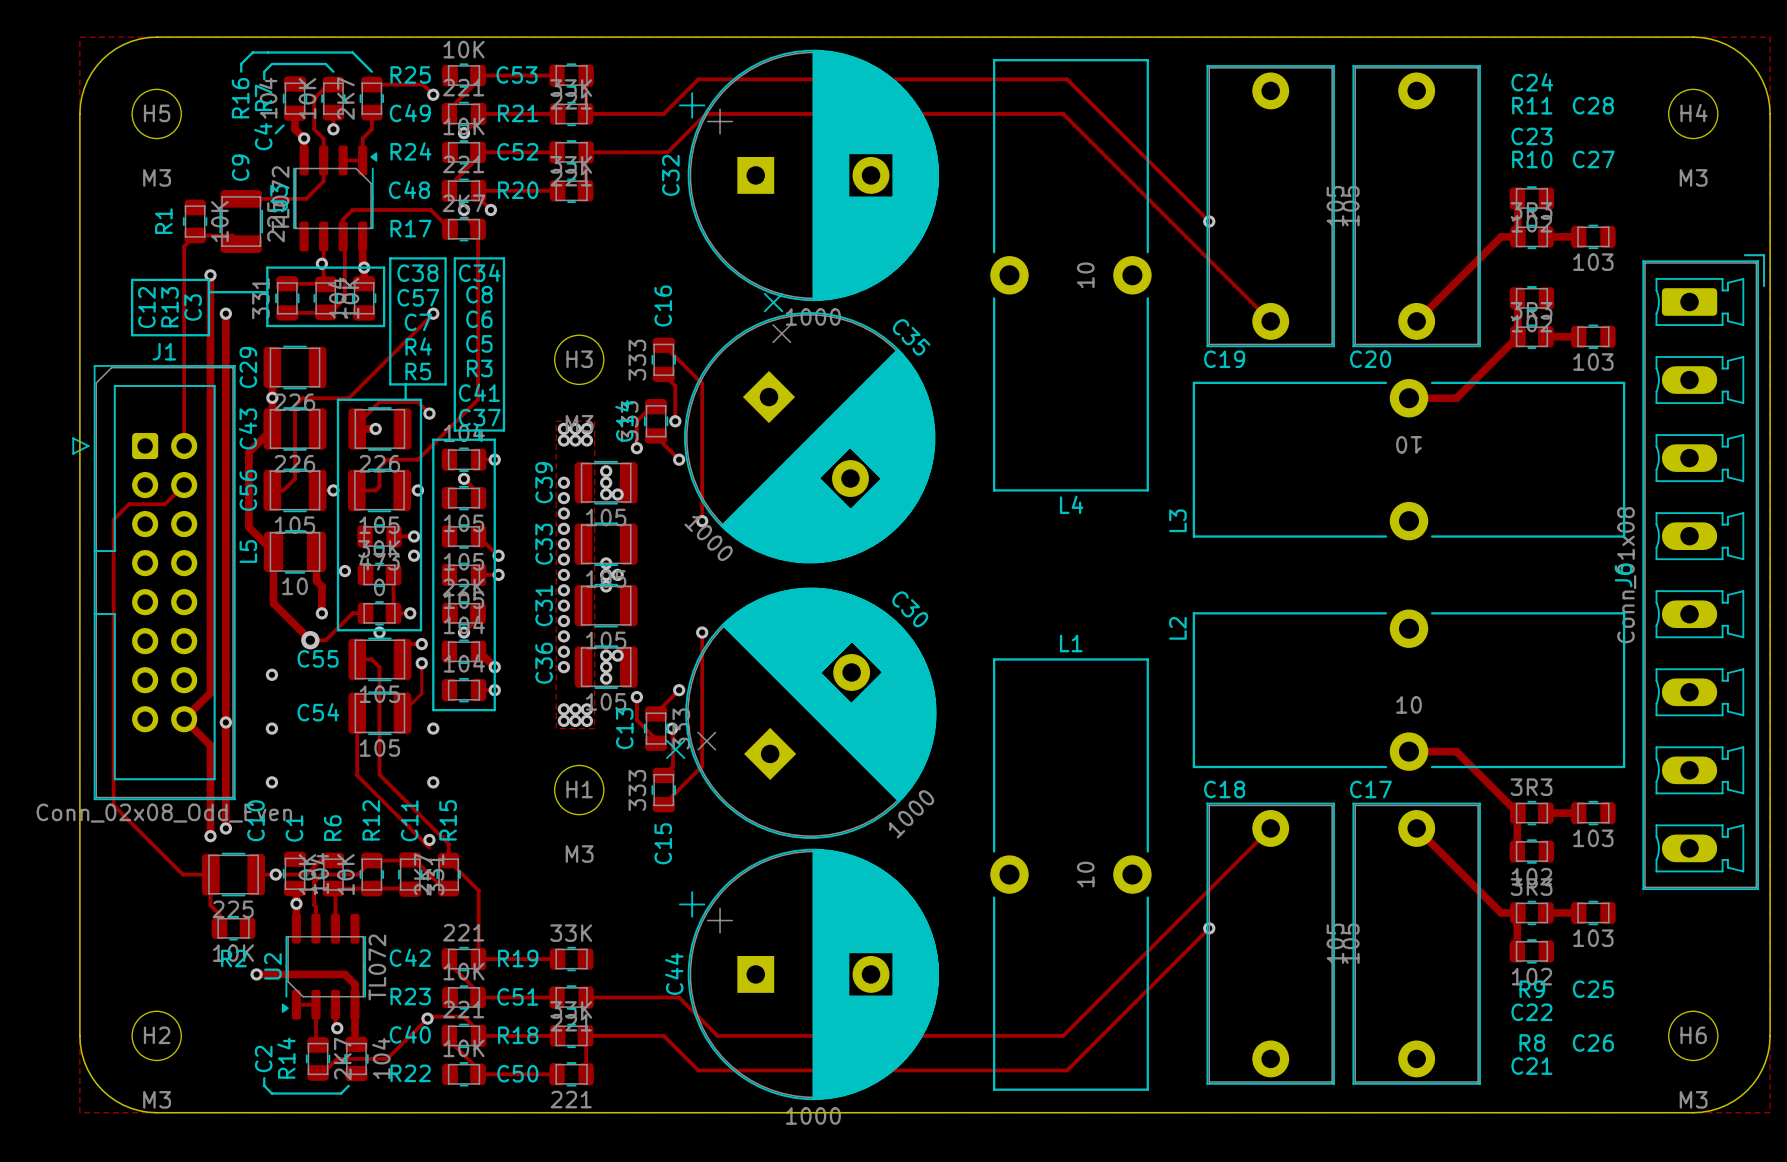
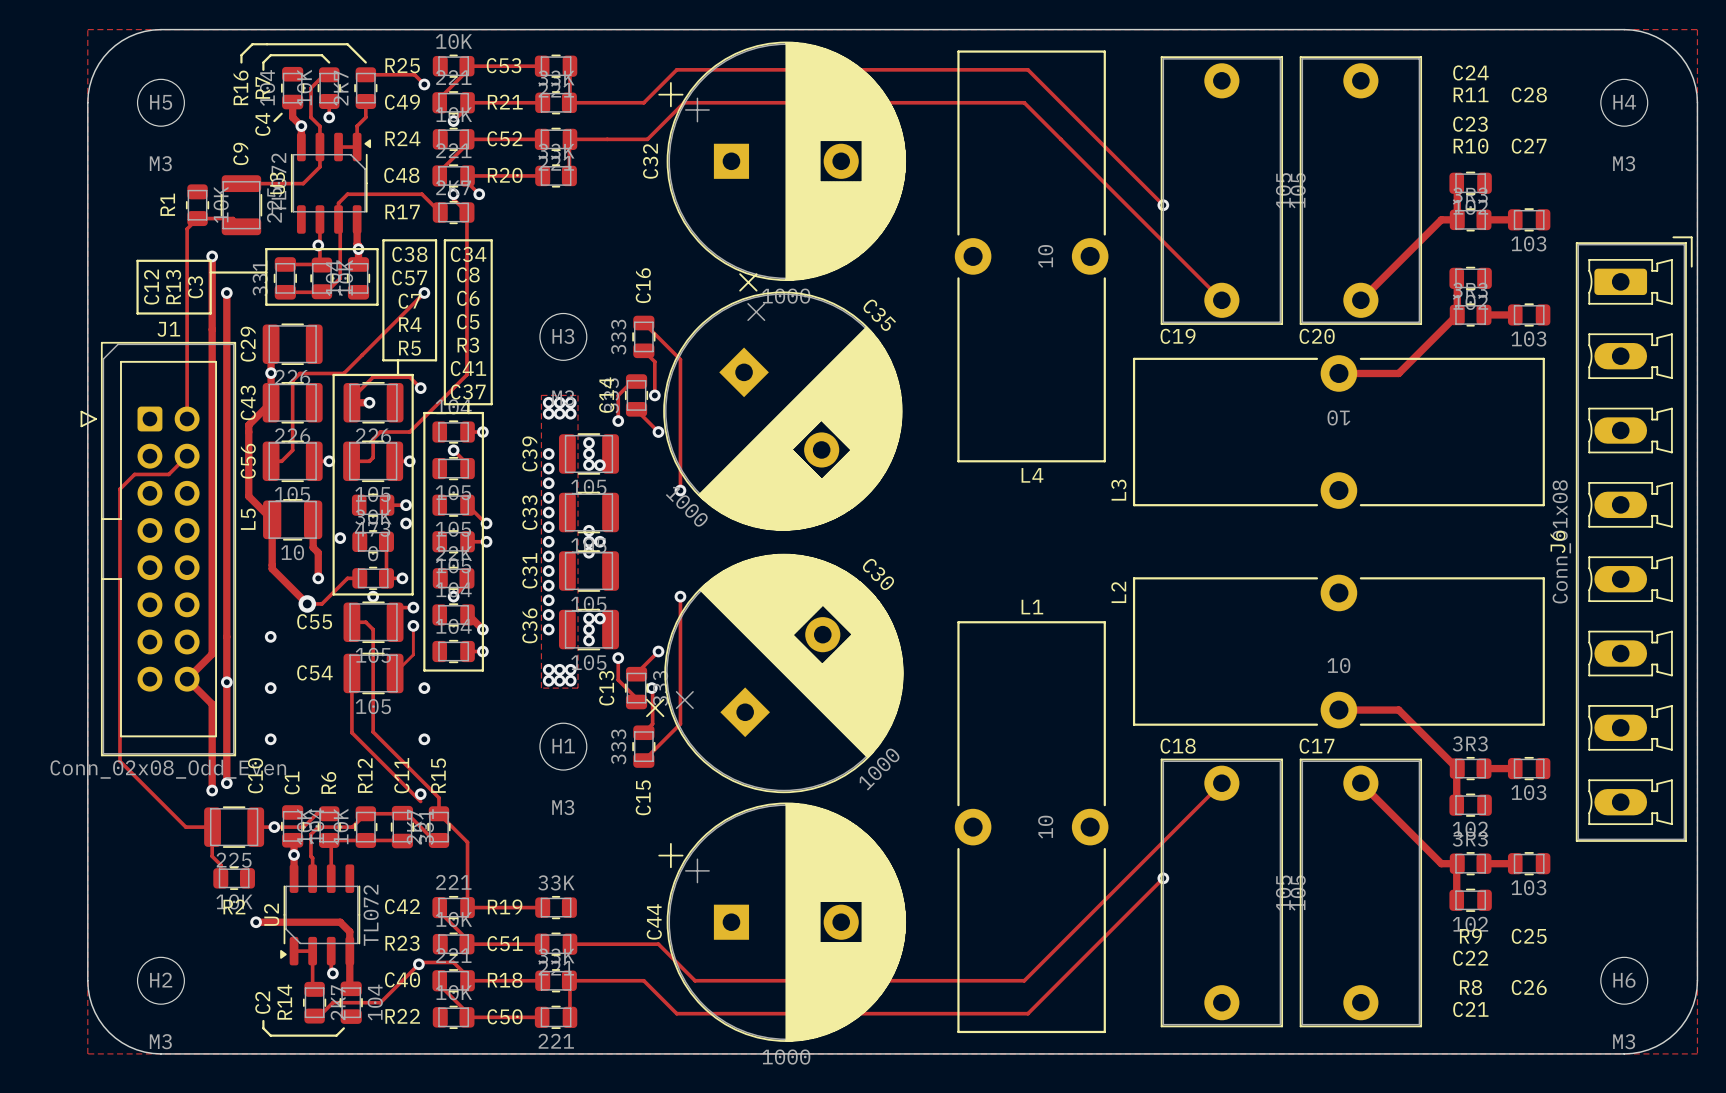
L3 position: (1409, 459) -> (1338, 432)
L2 position: (1409, 690) -> (1338, 651)

